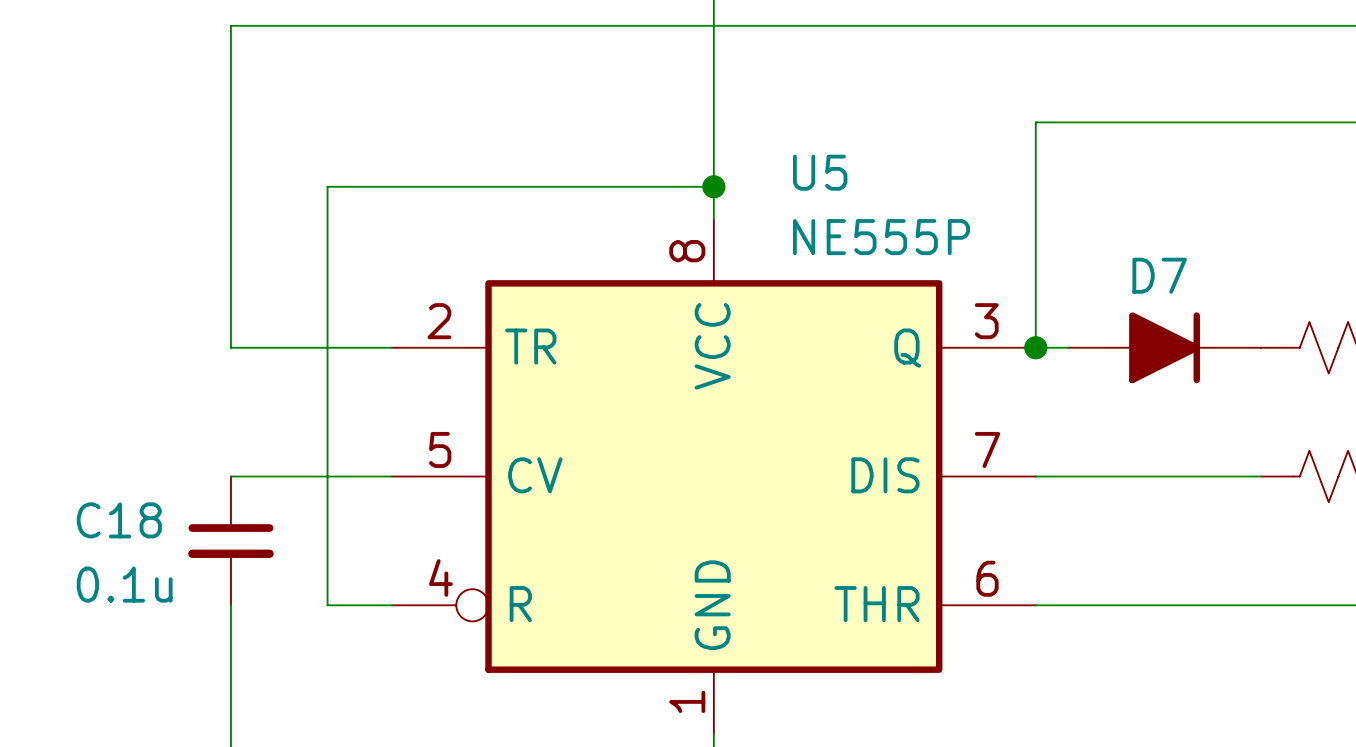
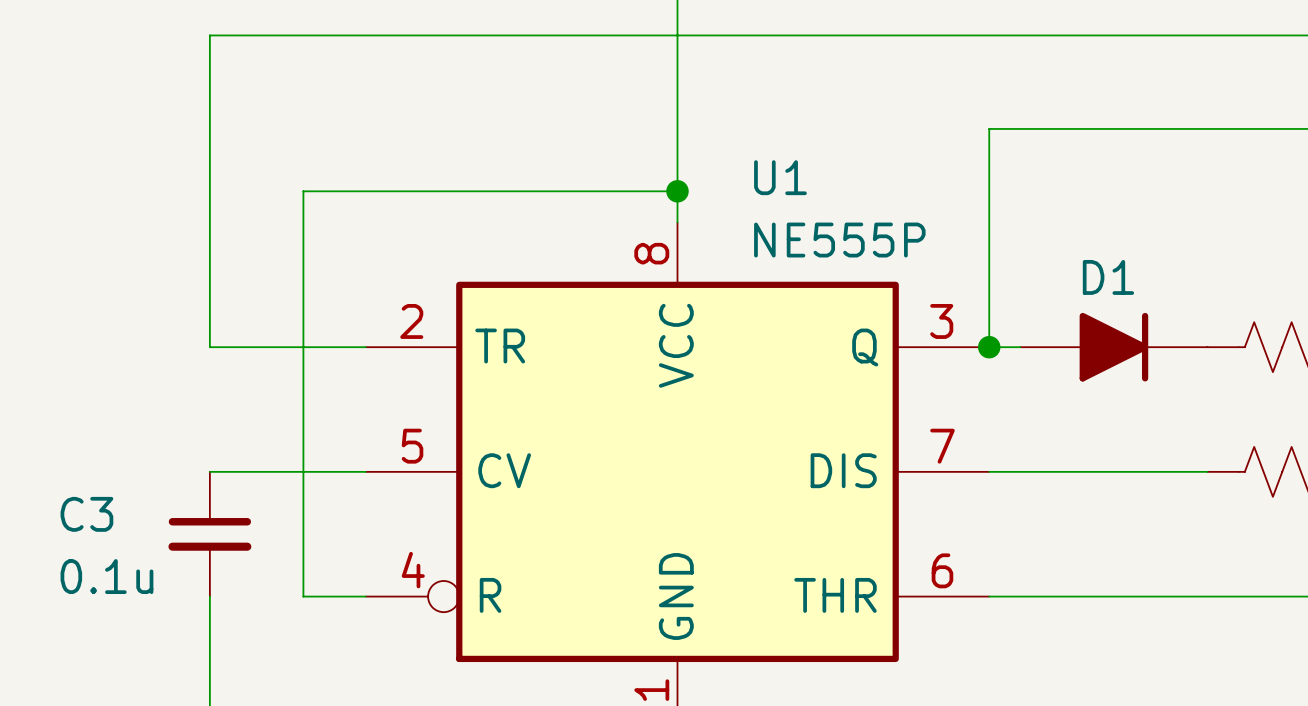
U5 name: U5 (820, 172) -> U1 (780, 177)
D7 name: D7 (1159, 275) -> D1 (1108, 277)
C18 name: C18 (119, 520) -> C3 (86, 514)

